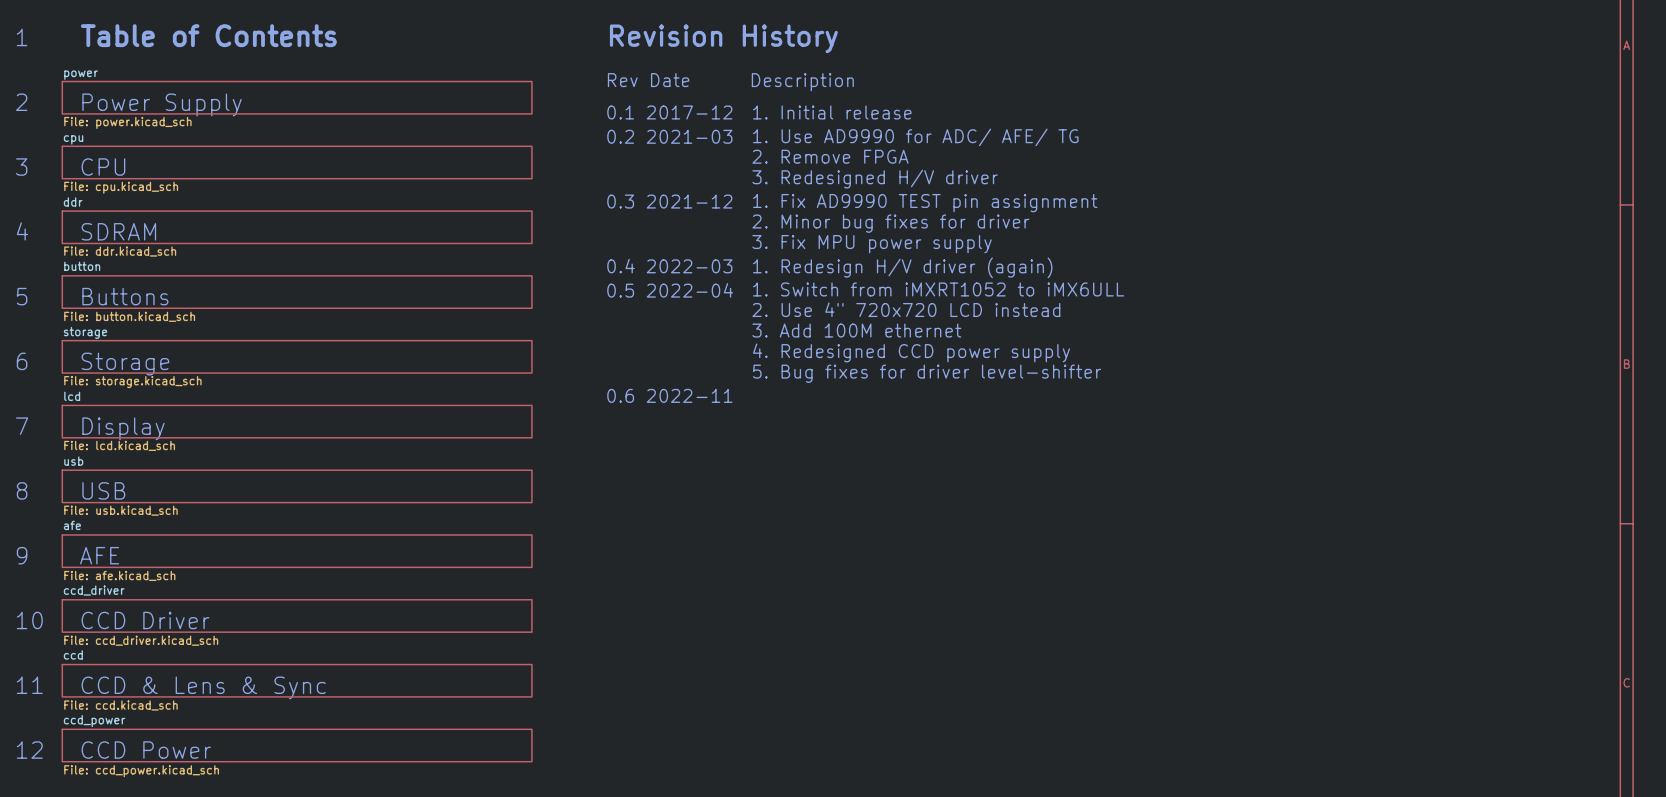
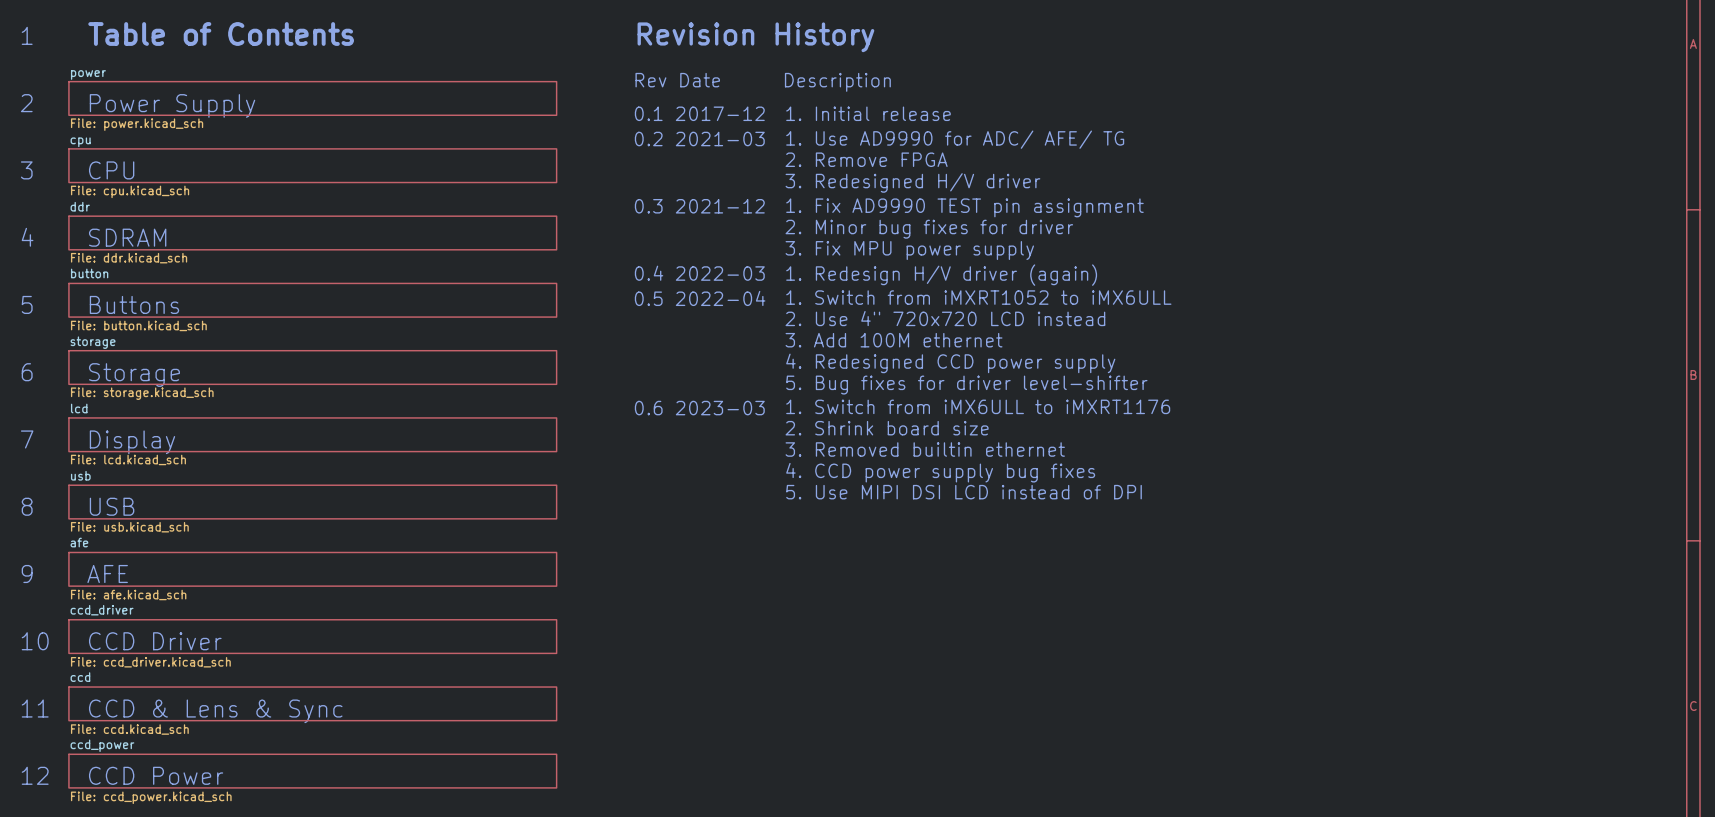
text: none -> 1. Switch from iMX6ULL to iMXRT1176 (978, 406)
text: 0.6 2022-11 (669, 395) -> 0.6 2023-03 (699, 408)
text: none -> 2. Shrink board size (887, 428)
text: none -> 3. Removed builtin ethernet (925, 449)
text: none -> 4. CCD power supply bug fixes (940, 472)
text: none -> 5. Use MIPI DSI LCD instead of DPI (964, 492)

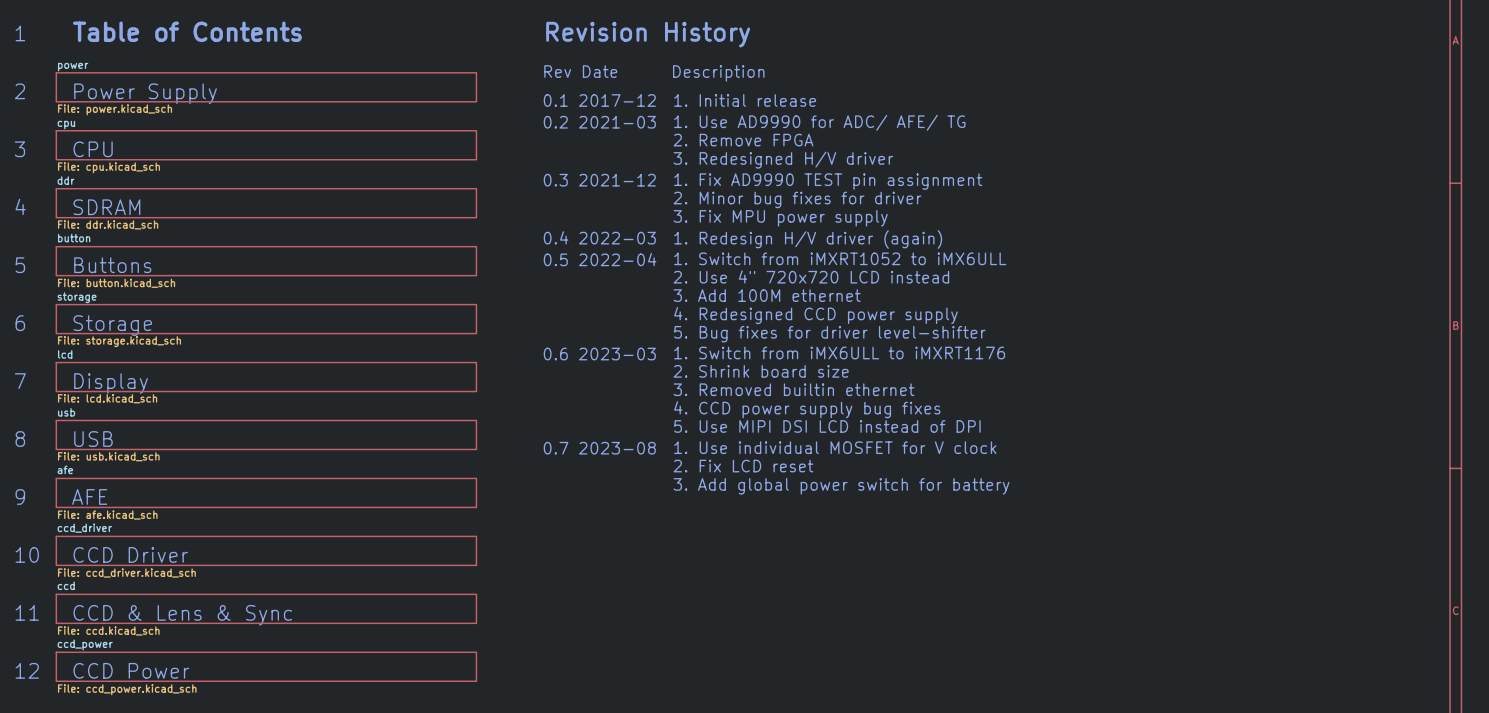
text: none -> 1. Use individual MOSFET for V clock (835, 447)
text: none -> 0.7 2023-08 (599, 448)
text: none -> 2. Fix LCD reset (743, 466)
text: none -> 3. Add global power switch for battery (841, 486)

